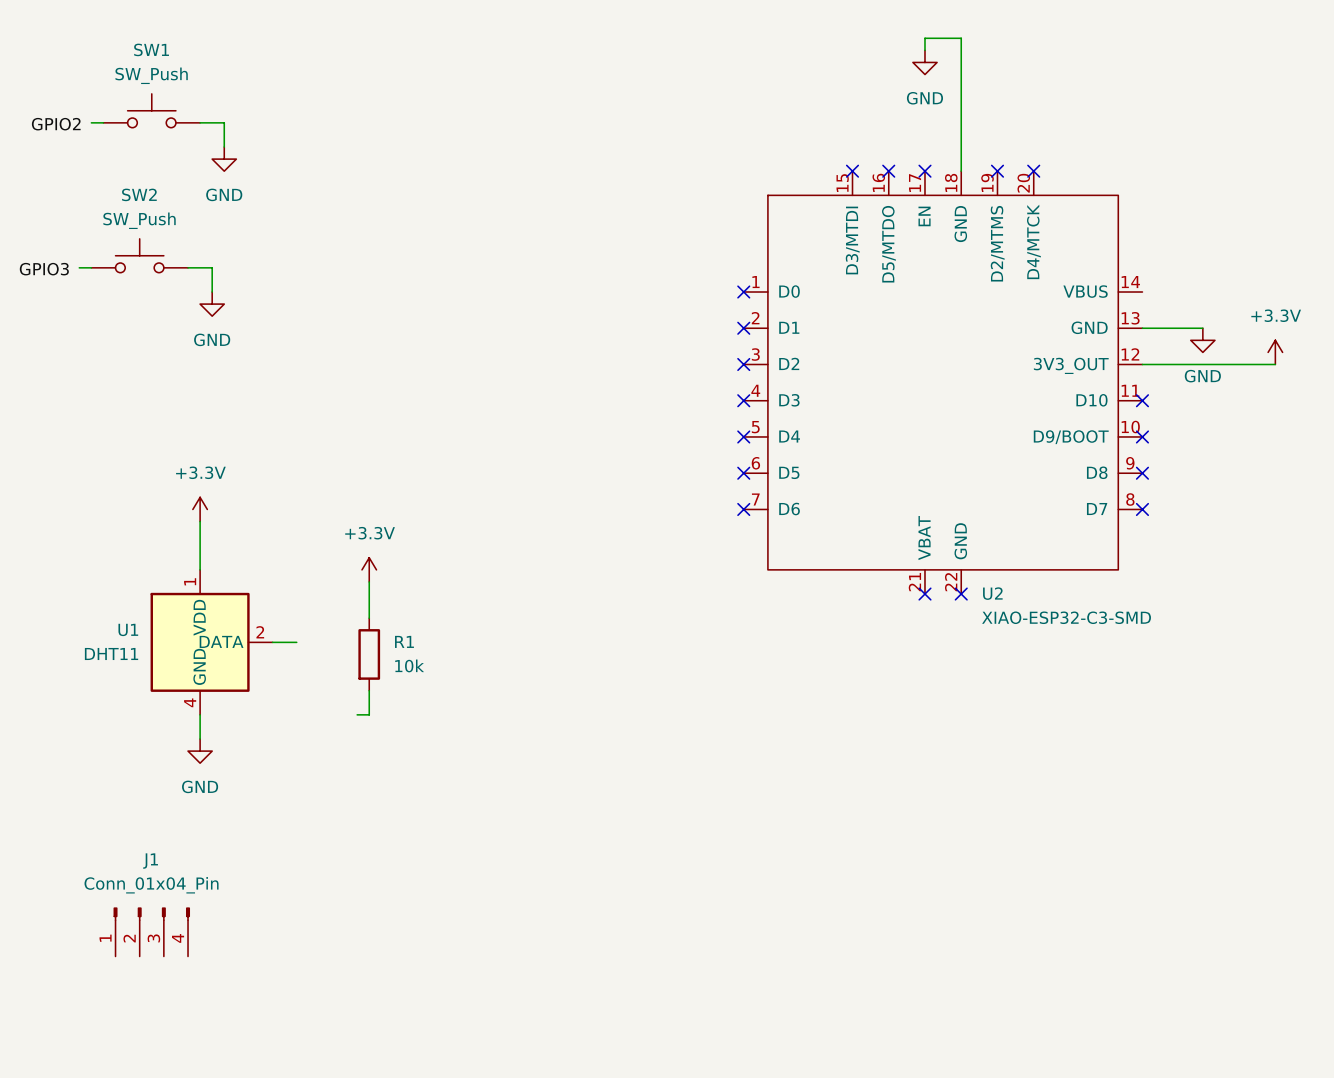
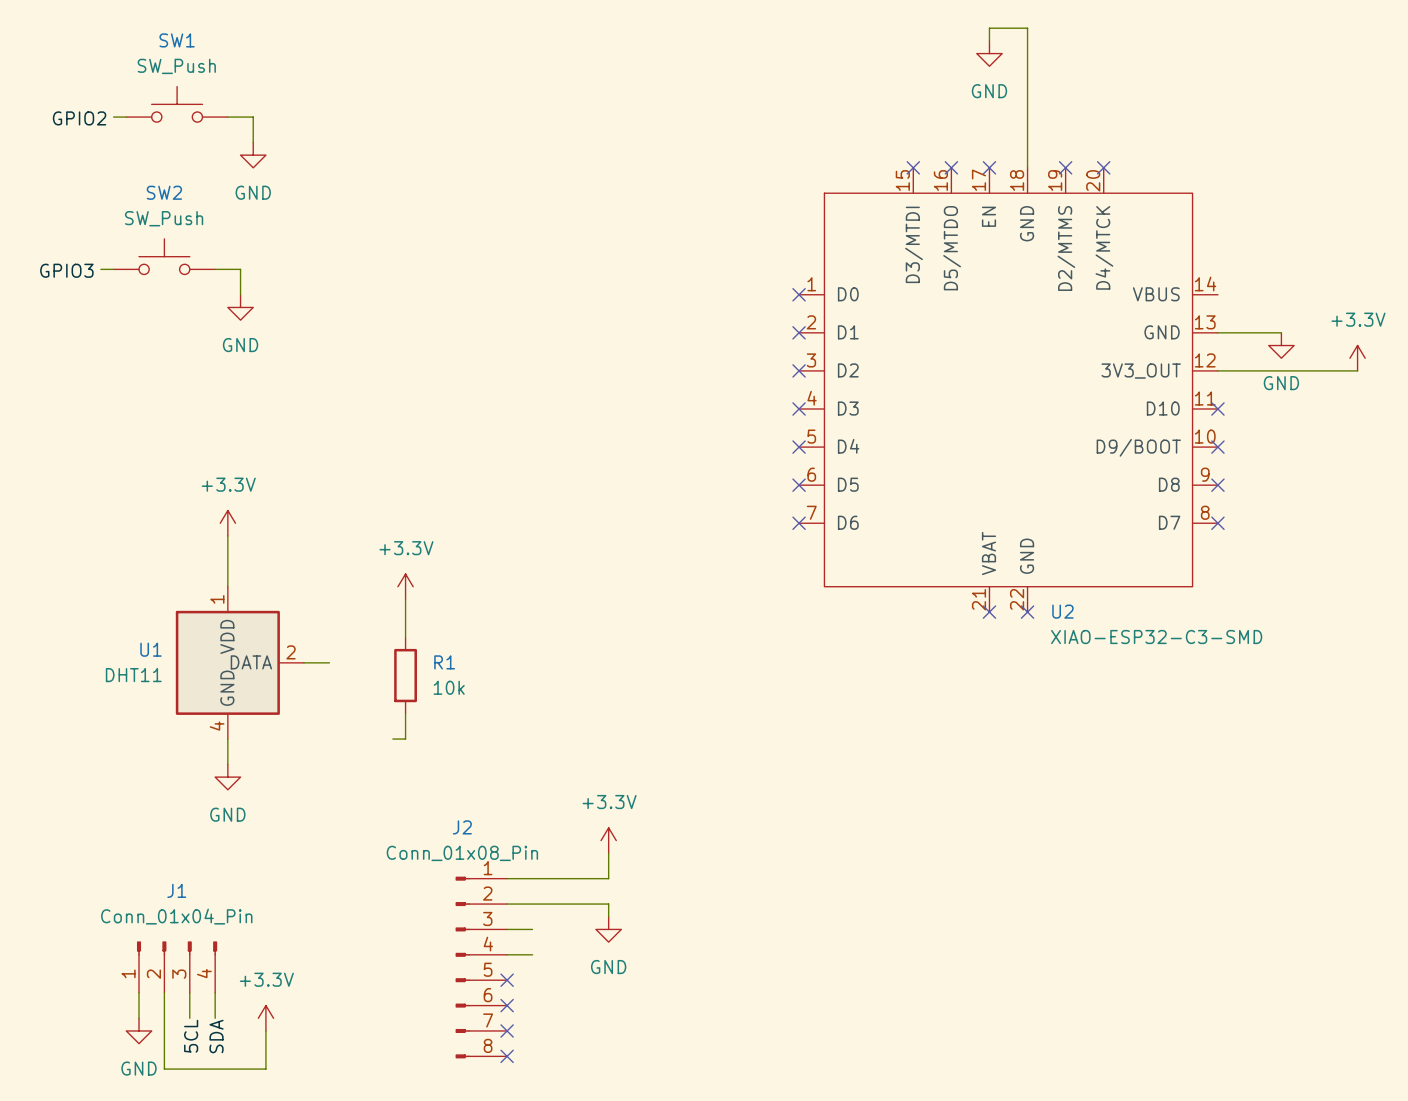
power symbol: none -> +3.3V (608, 840)
wire: none -> (608, 853) (608, 878) (507, 878)
wire: none -> (507, 904) (608, 904) (608, 916)
wire: none -> (507, 929) (532, 929)
power symbol: none -> GND (608, 929)
wire: none -> (507, 954) (532, 954)
J2: none -> Conn_01x08_Pin (481, 967)
no-connect mark: none -> (507, 980)
wire: none -> (139, 992) (139, 1018)
wire: none -> (164, 992) (164, 1069) (265, 1069) (265, 1030)
wire: none -> (189, 992) (189, 1018)
wire: none -> (215, 992) (215, 1018)
no-connect mark: none -> (507, 1005)
power symbol: none -> +3.3V (265, 1018)
power symbol: none -> GND (139, 1030)
no-connect mark: none -> (507, 1030)
label: none -> 5CL (191, 1036)
label: none -> SDA (216, 1036)
no-connect mark: none -> (507, 1056)

